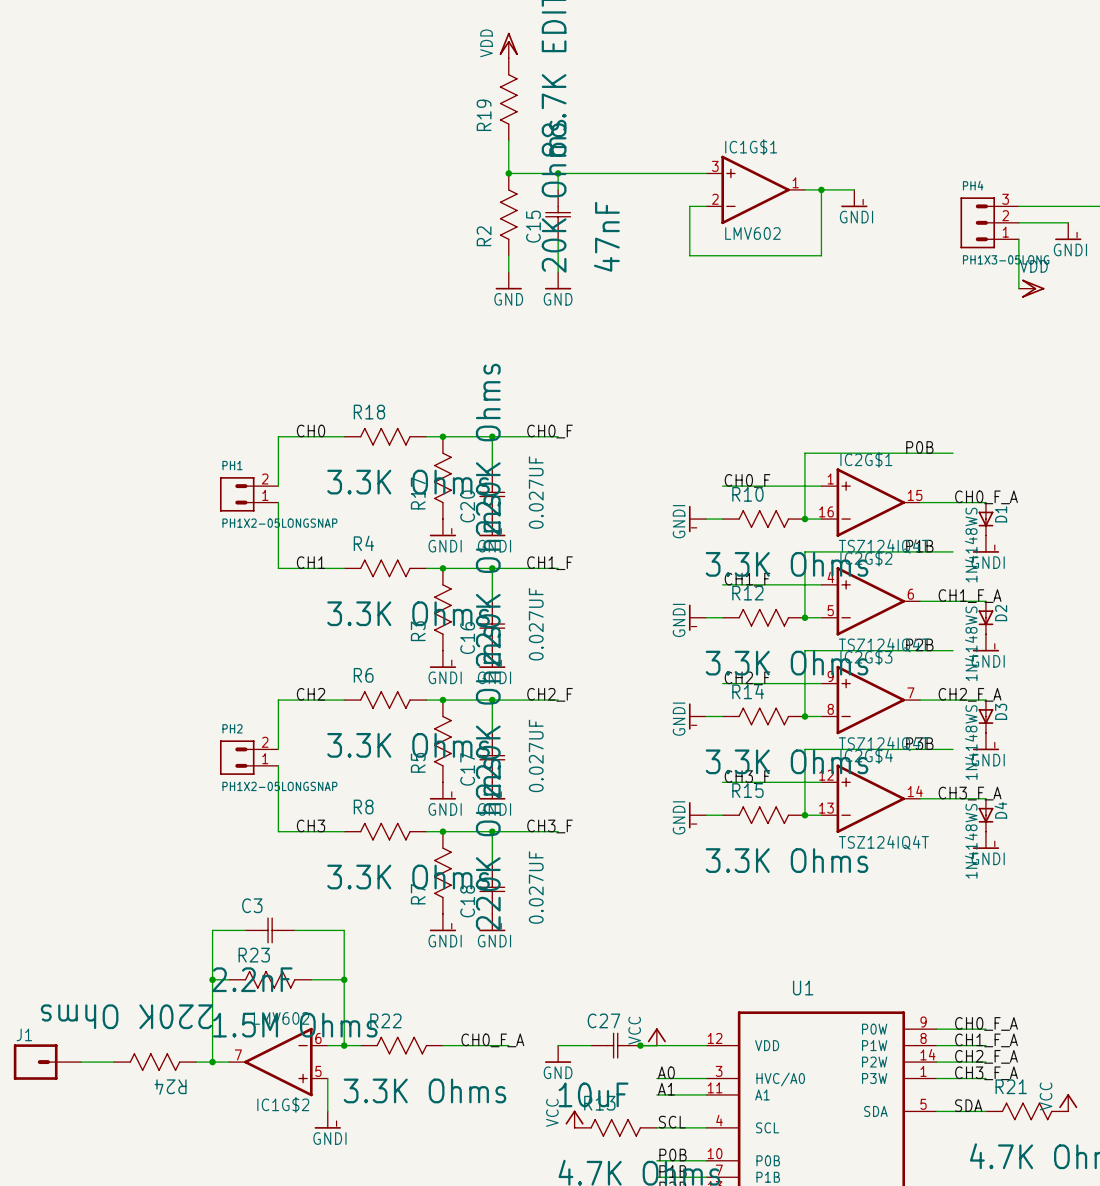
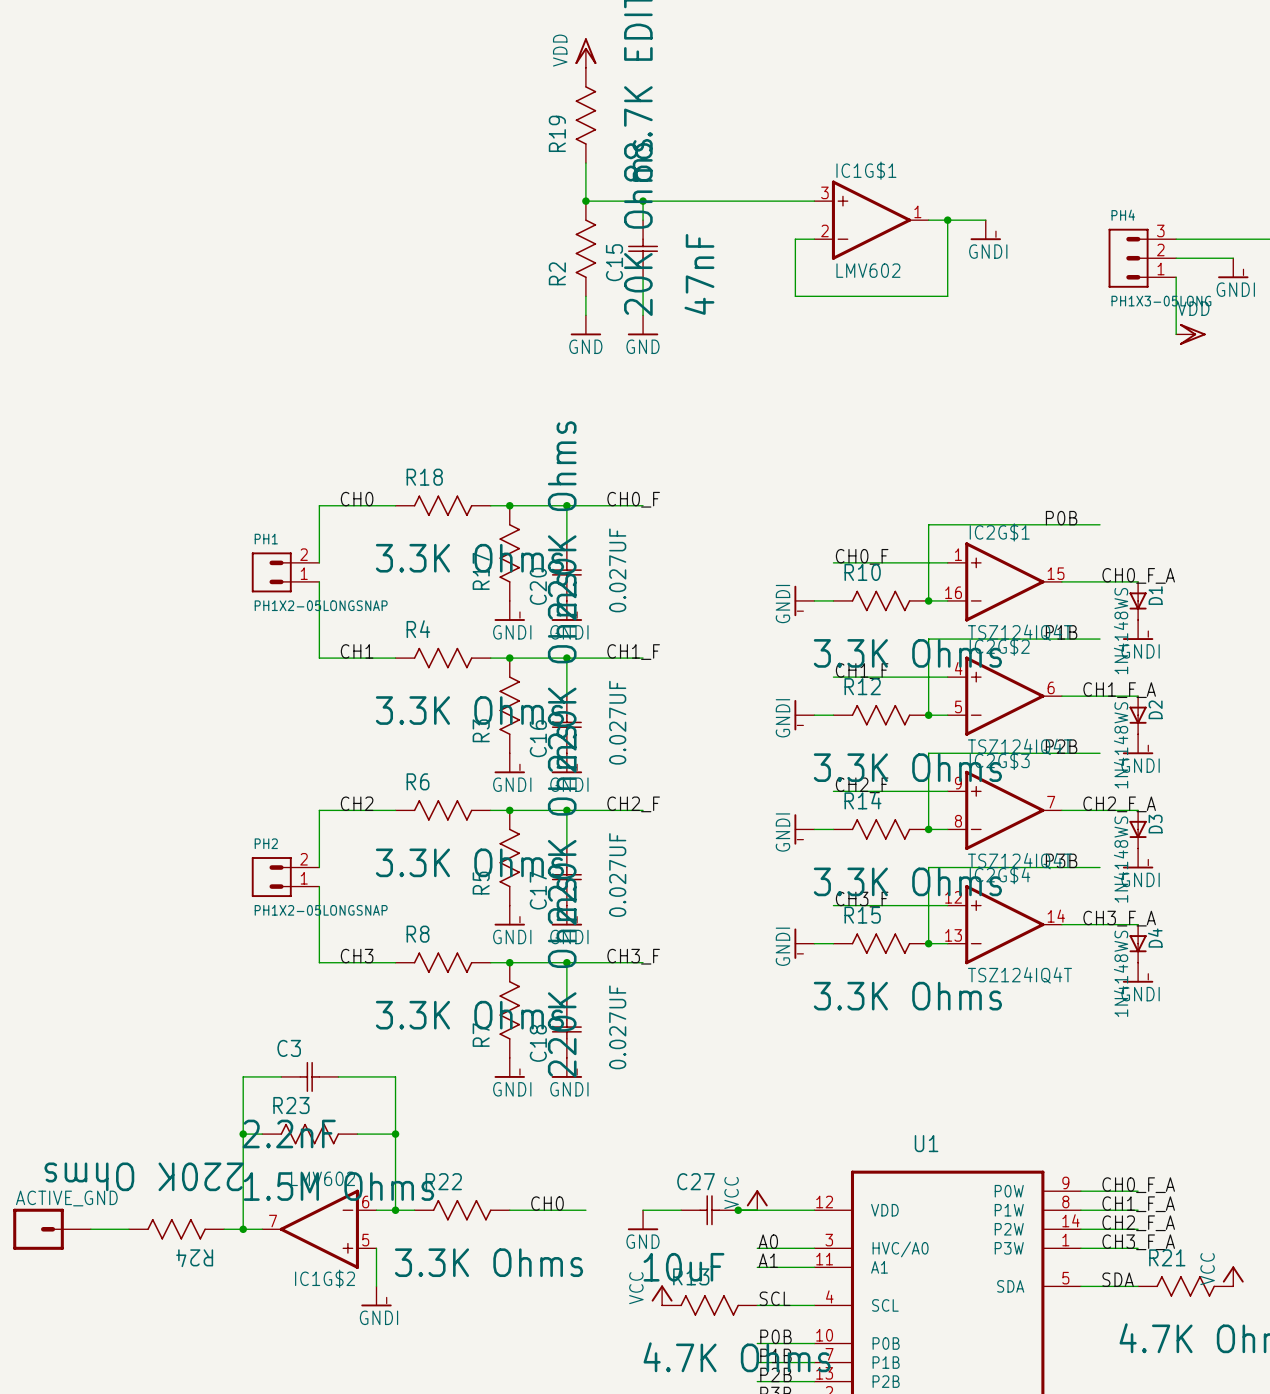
J1 name: J1 (24, 1034) -> ACTIVE_GND (66, 1198)
label: CH0_F_A (492, 1040) -> CH0 (547, 1203)

